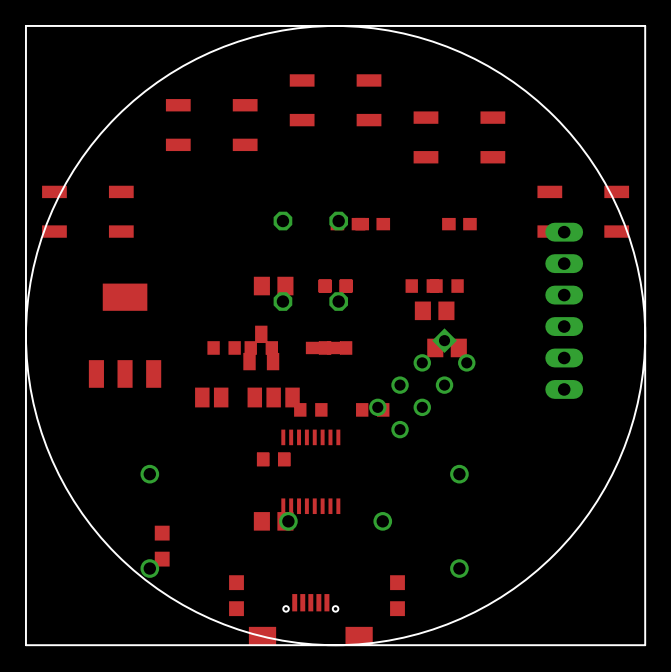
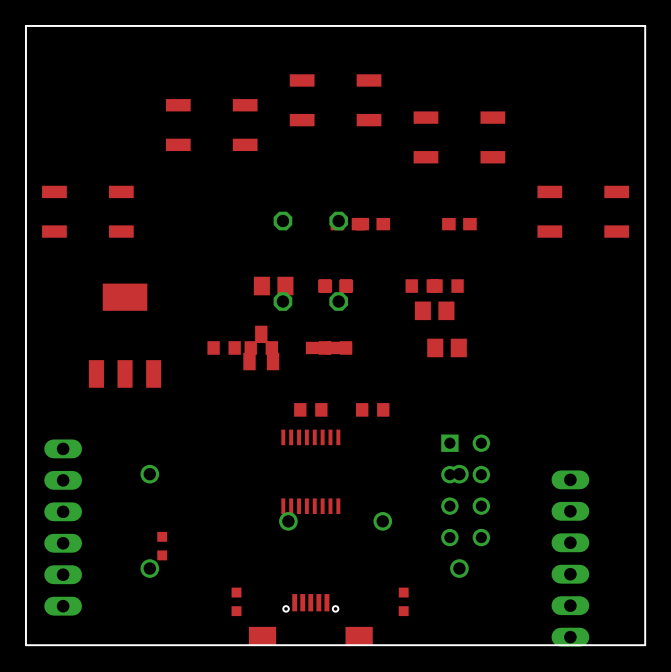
round board edge: [25, 25, 646, 646] -> none
part position: (564, 310) -> (570, 558)
part: (422, 383) -> none
part: (211, 397) -> none
part: (273, 397) -> none
part: (273, 459) -> none
part: none -> (465, 490)
part: (273, 521) -> none
part footprint: [154, 525, 170, 567] -> [157, 531, 168, 561]
part: none -> (63, 527)
part footprint: [229, 575, 244, 617] -> [231, 587, 242, 617]
part footprint: [390, 575, 405, 617] -> [398, 587, 409, 617]

